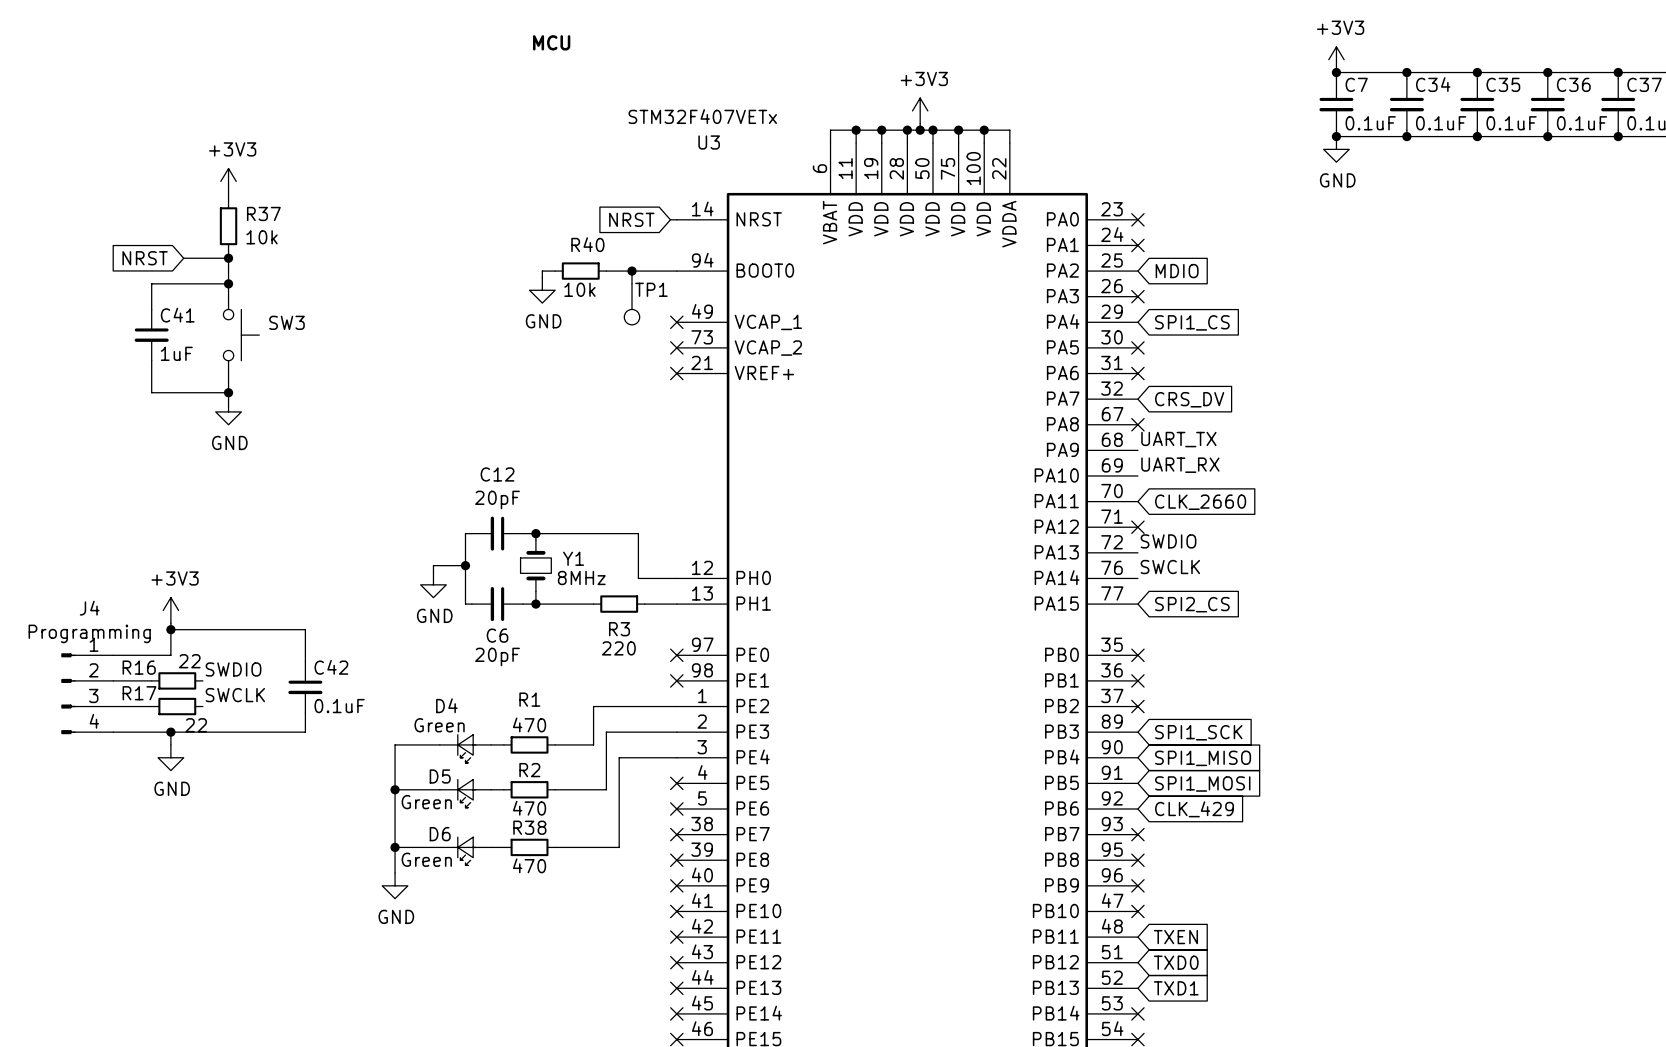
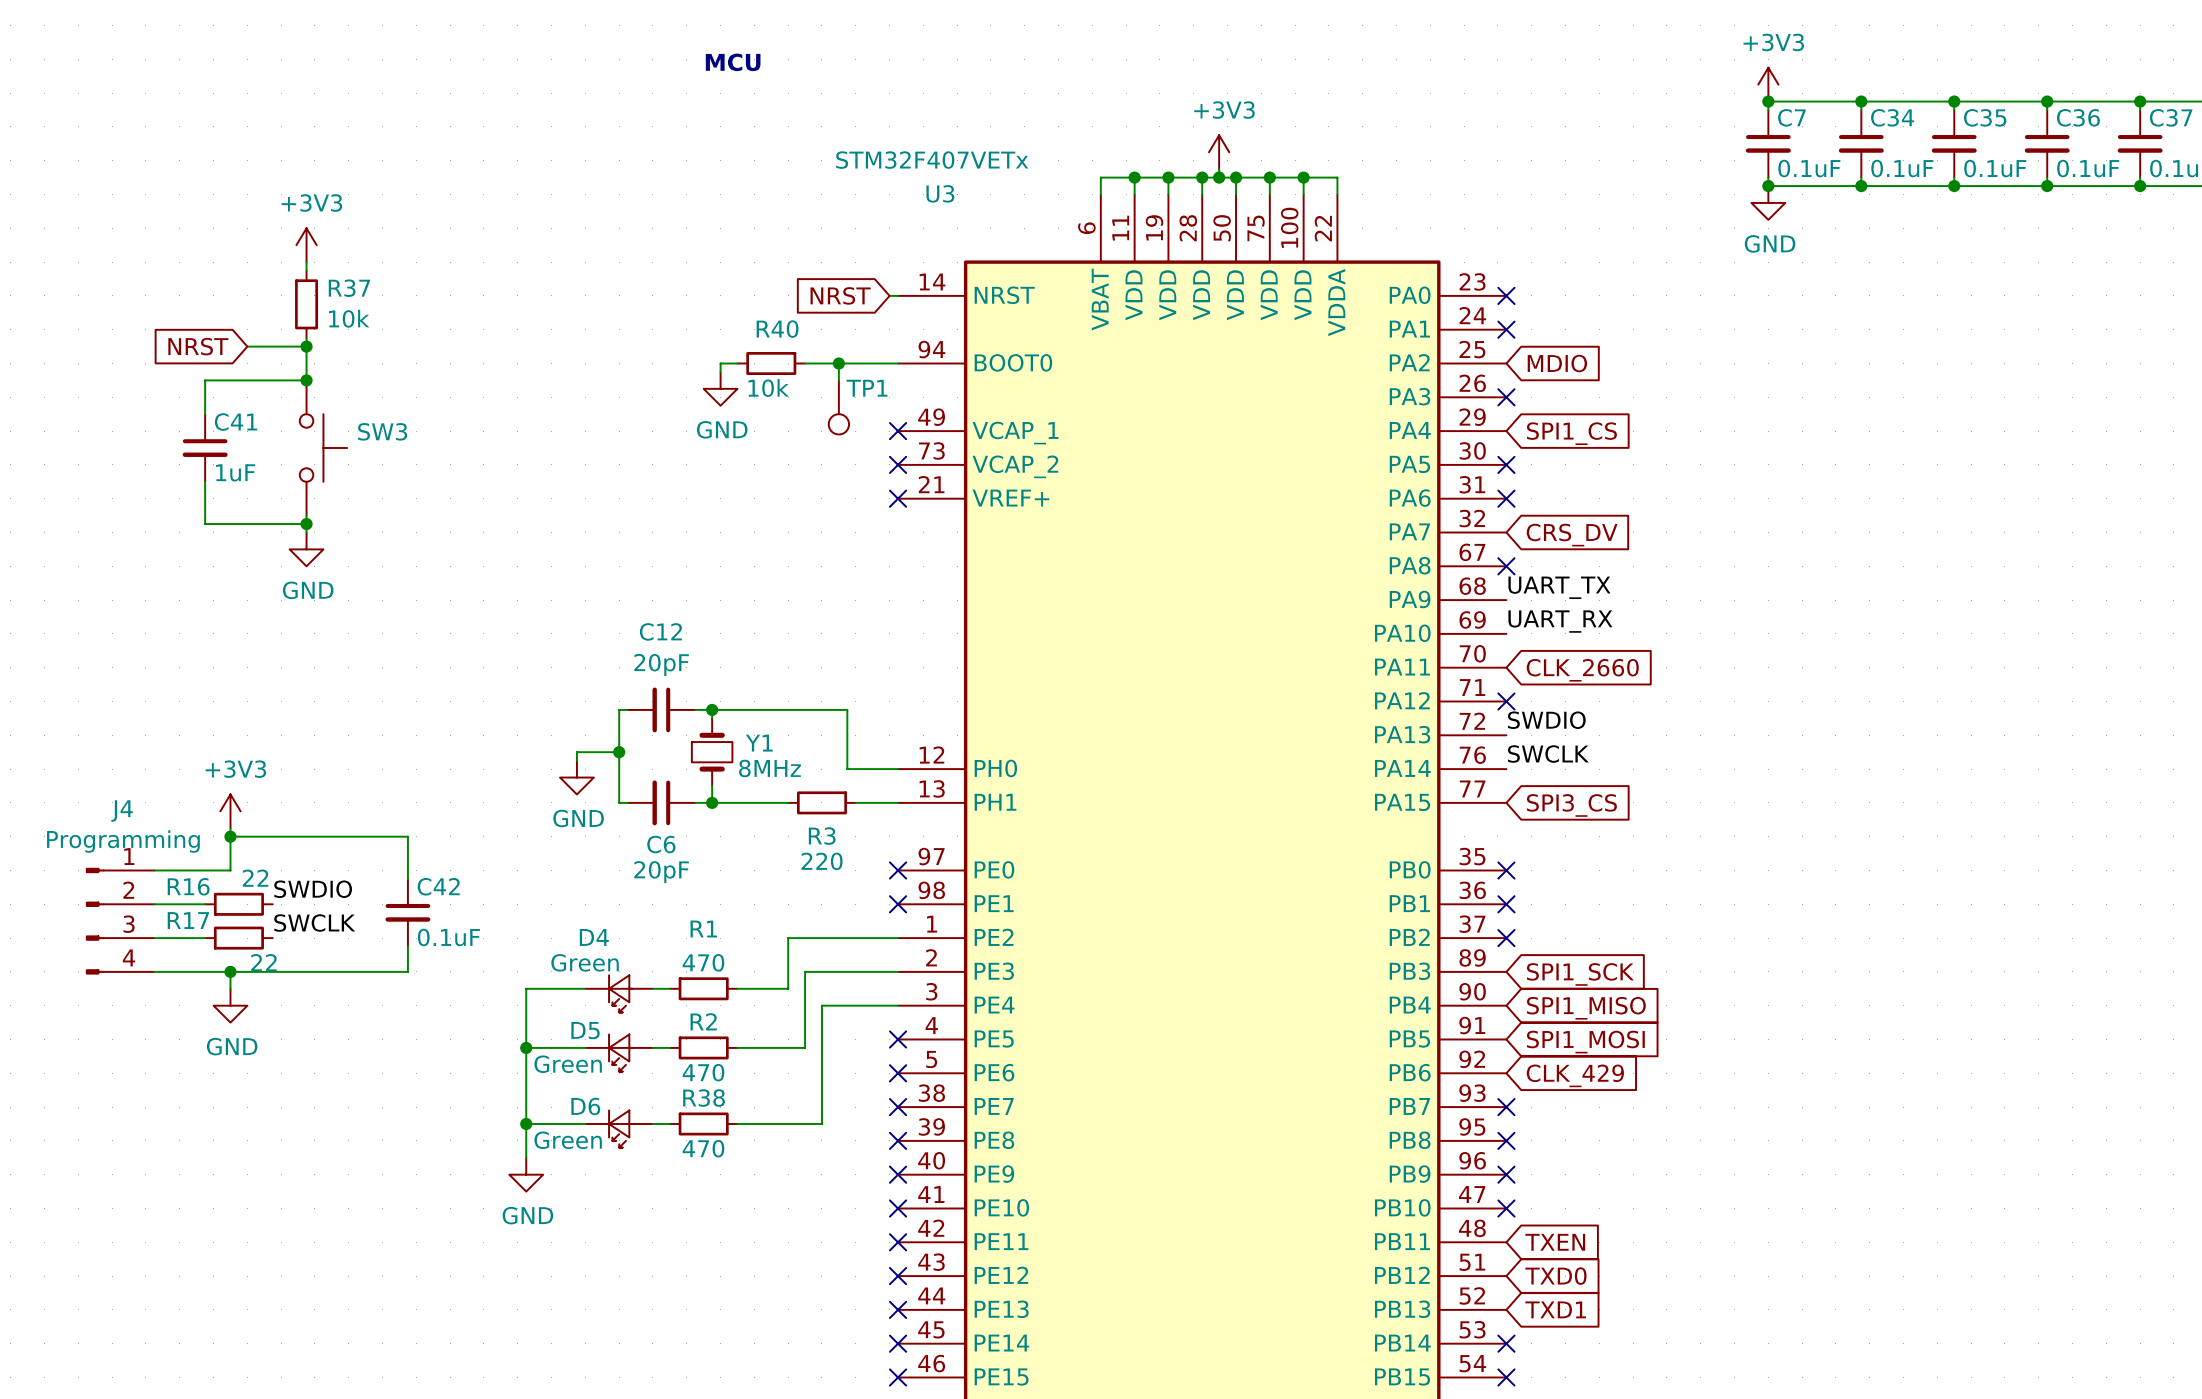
global label: SPI2_CS (1192, 604) -> SPI3_CS (1571, 805)

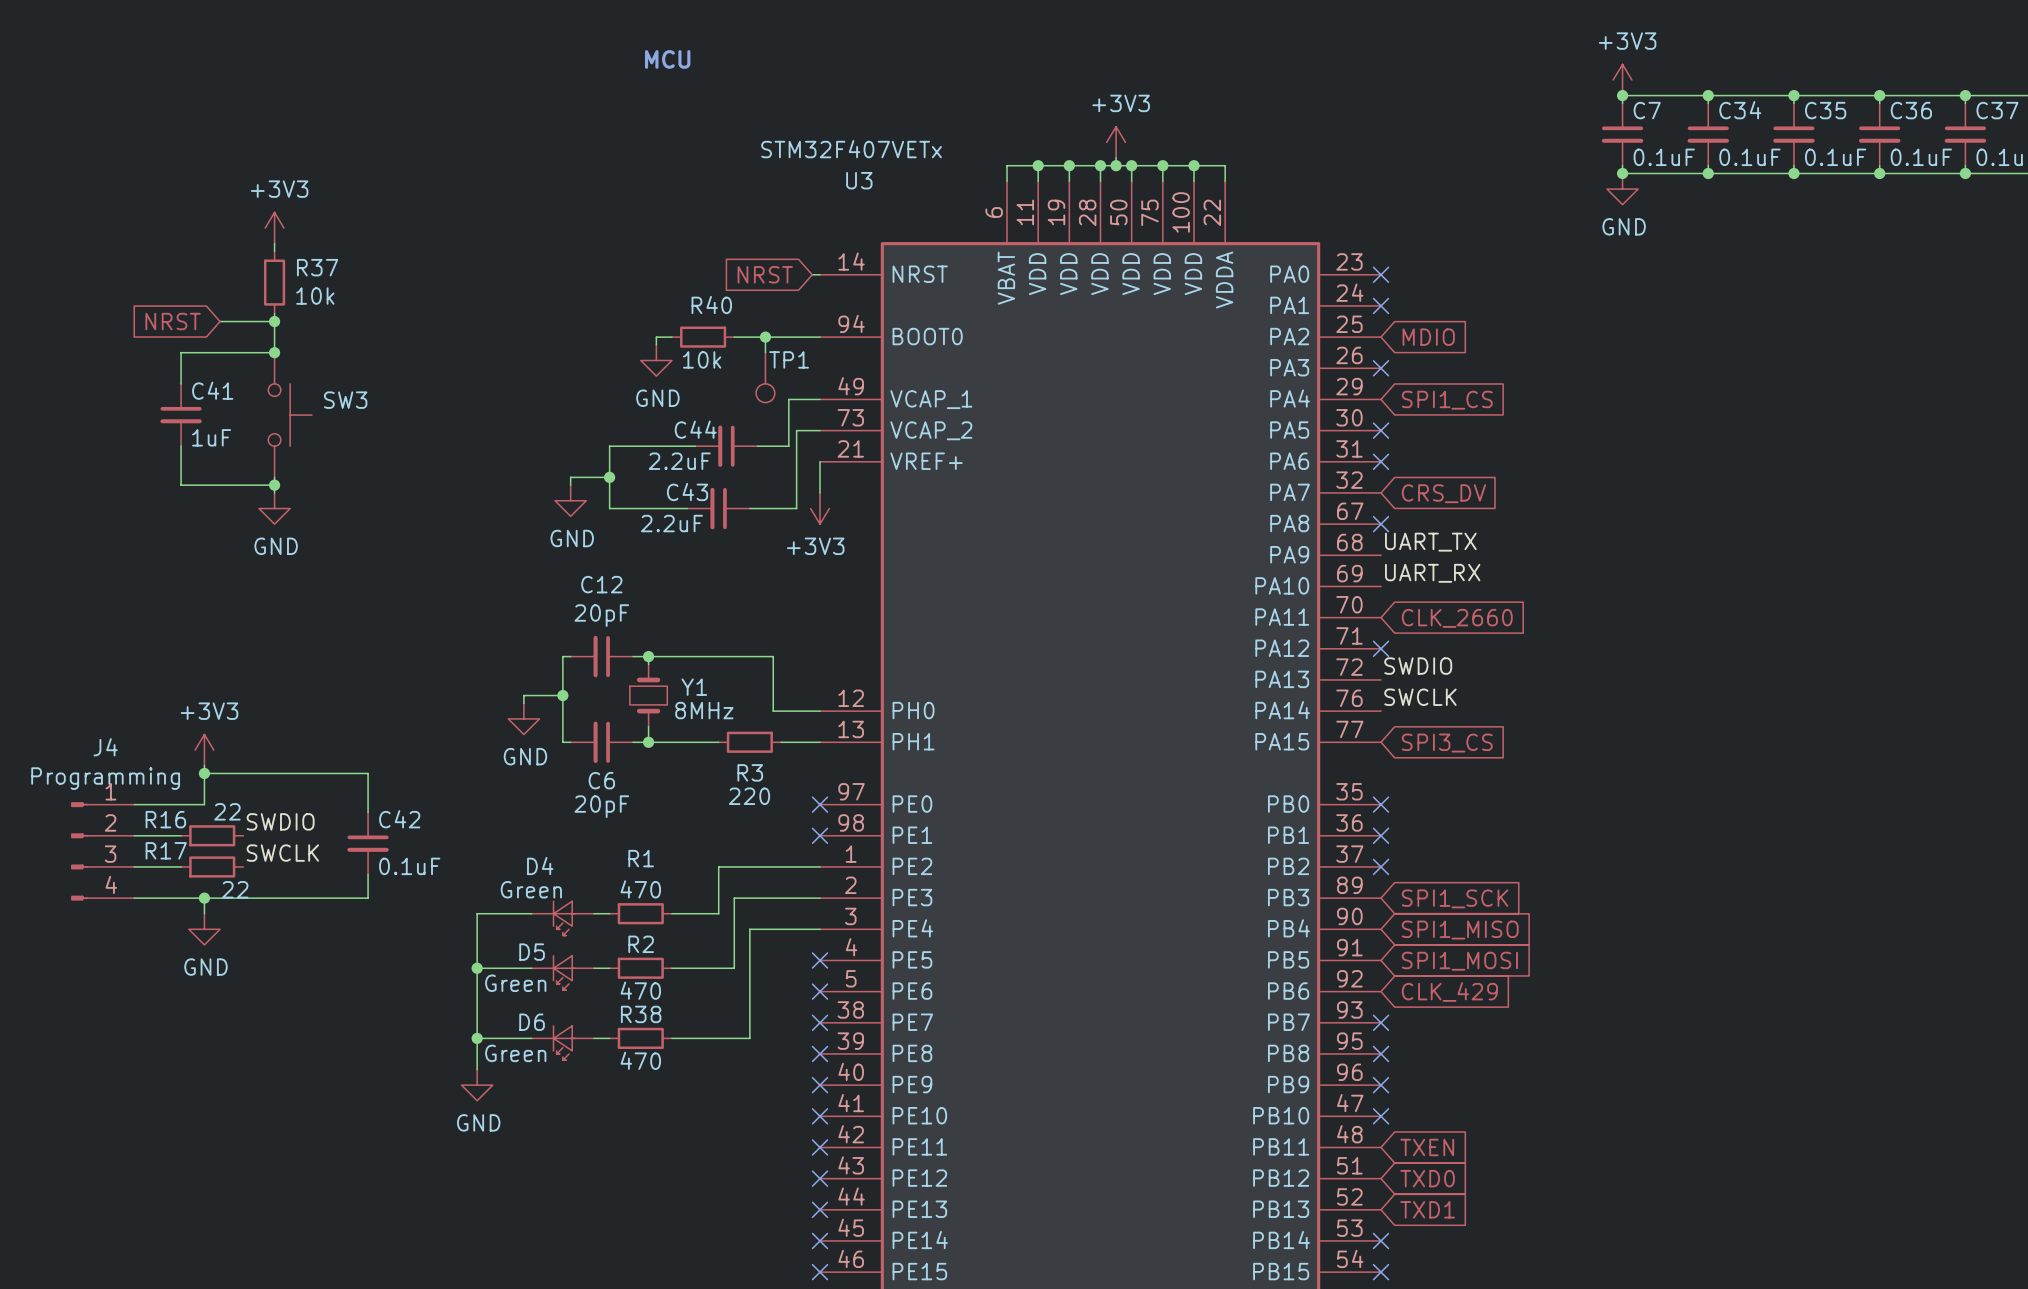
wire: none -> (819, 399) (788, 399) (788, 446) (757, 446)
no-connect mark: (898, 431) -> none
wire: none -> (819, 430) (796, 430) (796, 508) (749, 508)
no-connect mark: (898, 464) -> none
wire: none -> (695, 446) (609, 446) (609, 508) (687, 508)
C44: none -> 2.2uF (726, 446)
wire: none -> (819, 461) (819, 492)
no-connect mark: (898, 498) -> none
wire: none -> (609, 477) (570, 477) (570, 485)
junction: none -> (609, 477)
power symbol: none -> GND (570, 500)
C43: none -> 2.2uF (718, 508)
power symbol: none -> +3V3 (819, 508)

